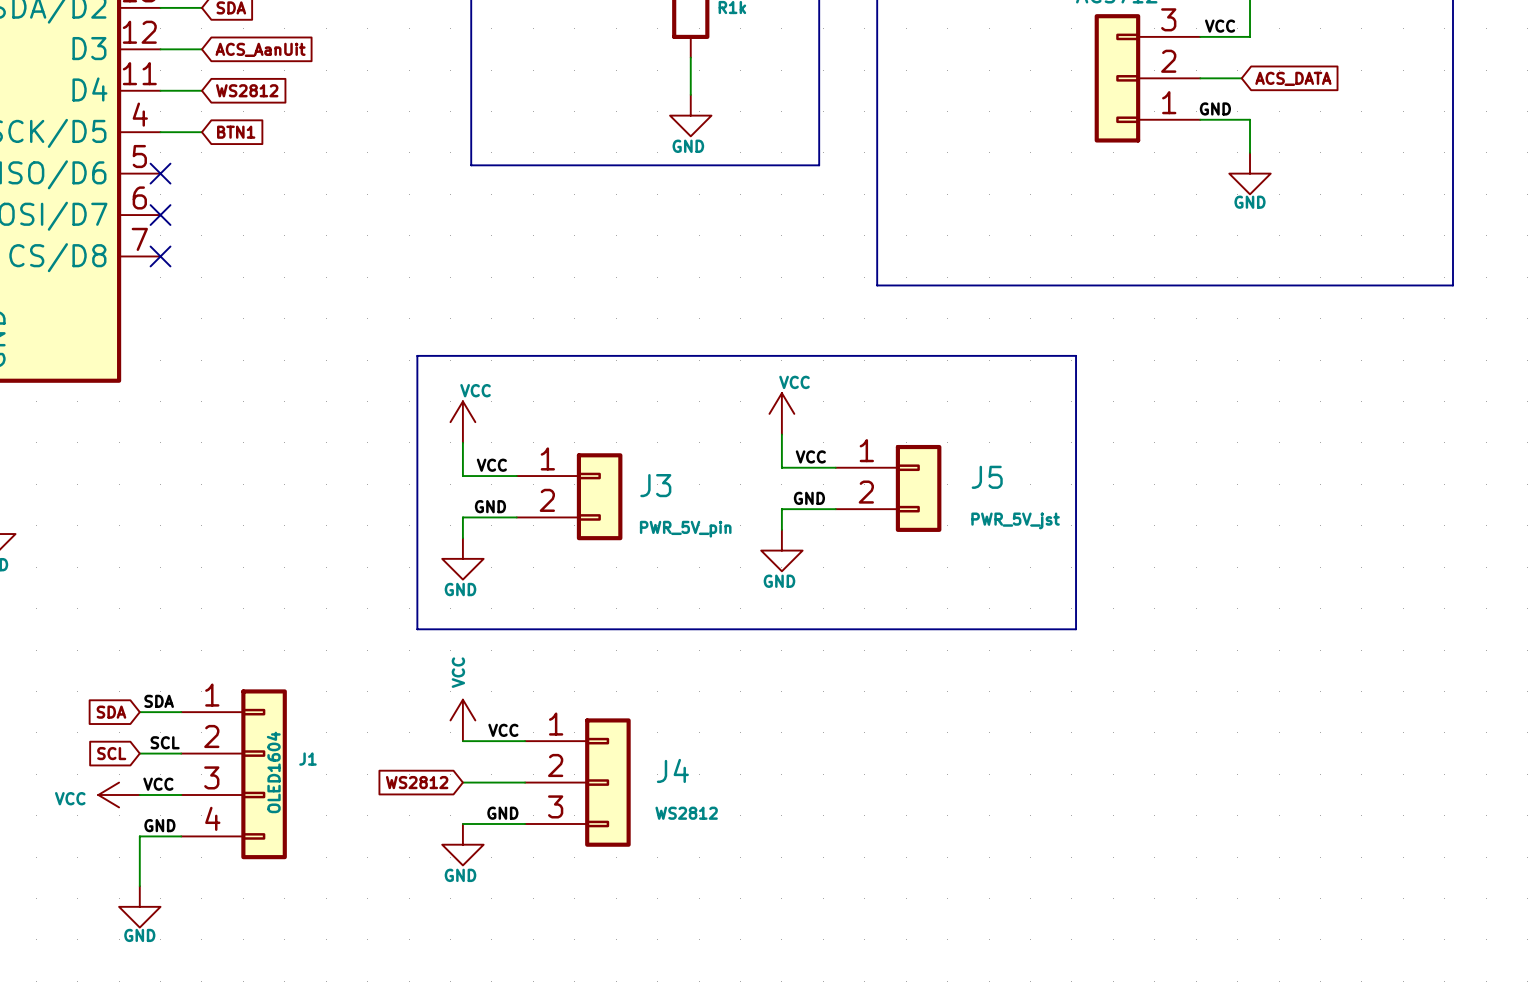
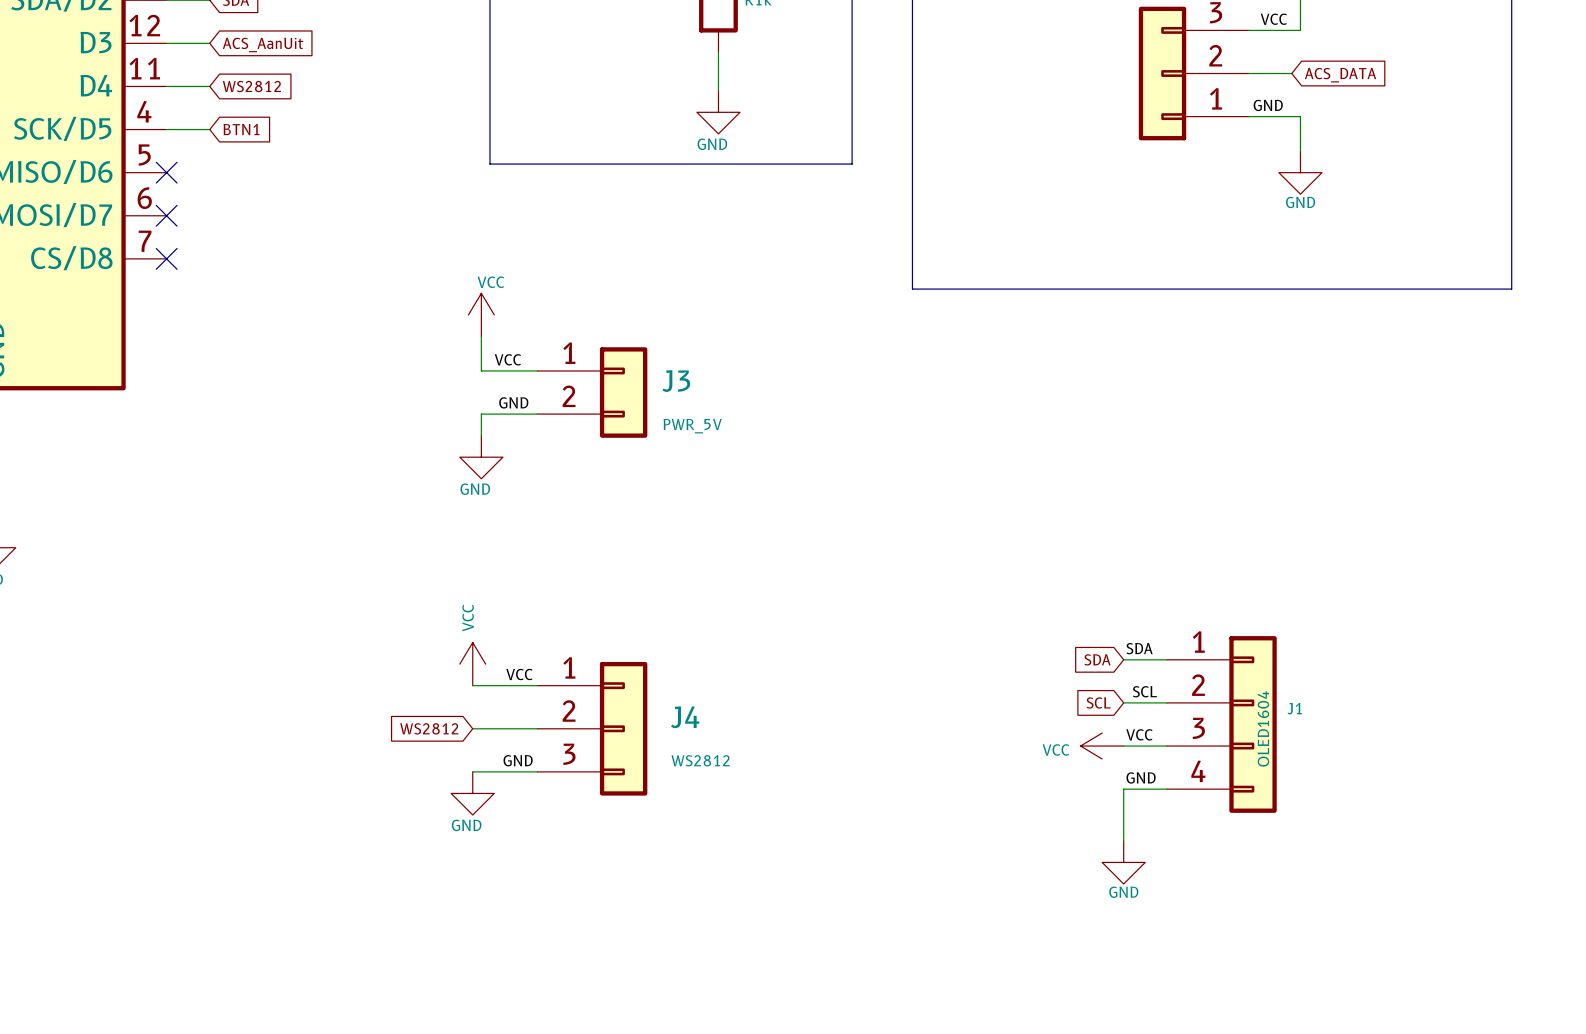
power symbol: none -> VCC (481, 314)
label: none -> VCC (507, 359)
line: (417, 355) (417, 629) (1076, 629) (1076, 355) (417, 355) -> none
power symbol: VCC (781, 413) -> none
power symbol: VCC (462, 422) -> none
wire: (781, 434) (781, 467) (835, 467) -> none
wire: (462, 442) (462, 476) (516, 476) -> (481, 336) (481, 370) (537, 370)
power symbol: none -> GND (481, 457)
label: VCC (810, 456) -> none
label: VCC (491, 465) -> none
J5: PWR_5V_jst (888, 488) -> none
J3 position: (569, 496) -> (592, 392)
label: GND (809, 498) -> none
label position: GND (490, 506) -> GND (513, 402)
wire: (835, 509) (781, 509) (781, 529) -> none
wire: (516, 517) (462, 517) (462, 538) -> (537, 414) (481, 414) (481, 435)
J3 value: PWR_5V_pin (685, 529) -> PWR_5V (692, 426)
power symbol: GND (781, 550) -> none
power symbol: GND (462, 558) -> none
label: none -> SDA (1139, 648)
global label: none -> SDA (1097, 659)
wire: none -> (1123, 659) (1166, 659)
label: none -> SCL (1144, 691)
global label: none -> SCL (1098, 702)
wire: none -> (1123, 702) (1166, 702)
label: SDA (159, 701) -> none
global label: SDA (111, 712) -> none
wire: (139, 712) (181, 712) -> none
label: none -> VCC (1139, 734)
power symbol position: VCC (462, 720) -> VCC (472, 664)
power symbol: none -> VCC (1102, 746)
wire: none -> (1123, 746) (1166, 746)
label position: VCC (503, 730) -> VCC (519, 674)
wire: (462, 741) (525, 741) -> (472, 685) (537, 685)
label: SCL (165, 742) -> none
global label: SCL (111, 753) -> none
wire: (139, 753) (181, 753) -> none
label: none -> GND (1141, 777)
wire: none -> (1166, 789) (1123, 789) (1123, 840)
J1 position: (234, 774) -> (1221, 724)
global label position: WS2812 (417, 782) -> WS2812 (429, 728)
wire: (462, 782) (525, 782) -> (472, 728) (537, 728)
J4 position: (577, 782) -> (592, 728)
label: VCC (158, 784) -> none
power symbol: VCC (119, 795) -> none
wire: (139, 795) (181, 795) -> none
label position: GND (502, 813) -> GND (518, 760)
wire: (462, 823) (525, 823) -> (472, 771) (537, 771)
label: GND (159, 825) -> none
wire: (181, 836) (139, 836) (139, 886) -> none
power symbol: none -> GND (1123, 862)
power symbol position: GND (462, 844) -> GND (472, 793)
power symbol: GND (139, 906) -> none

